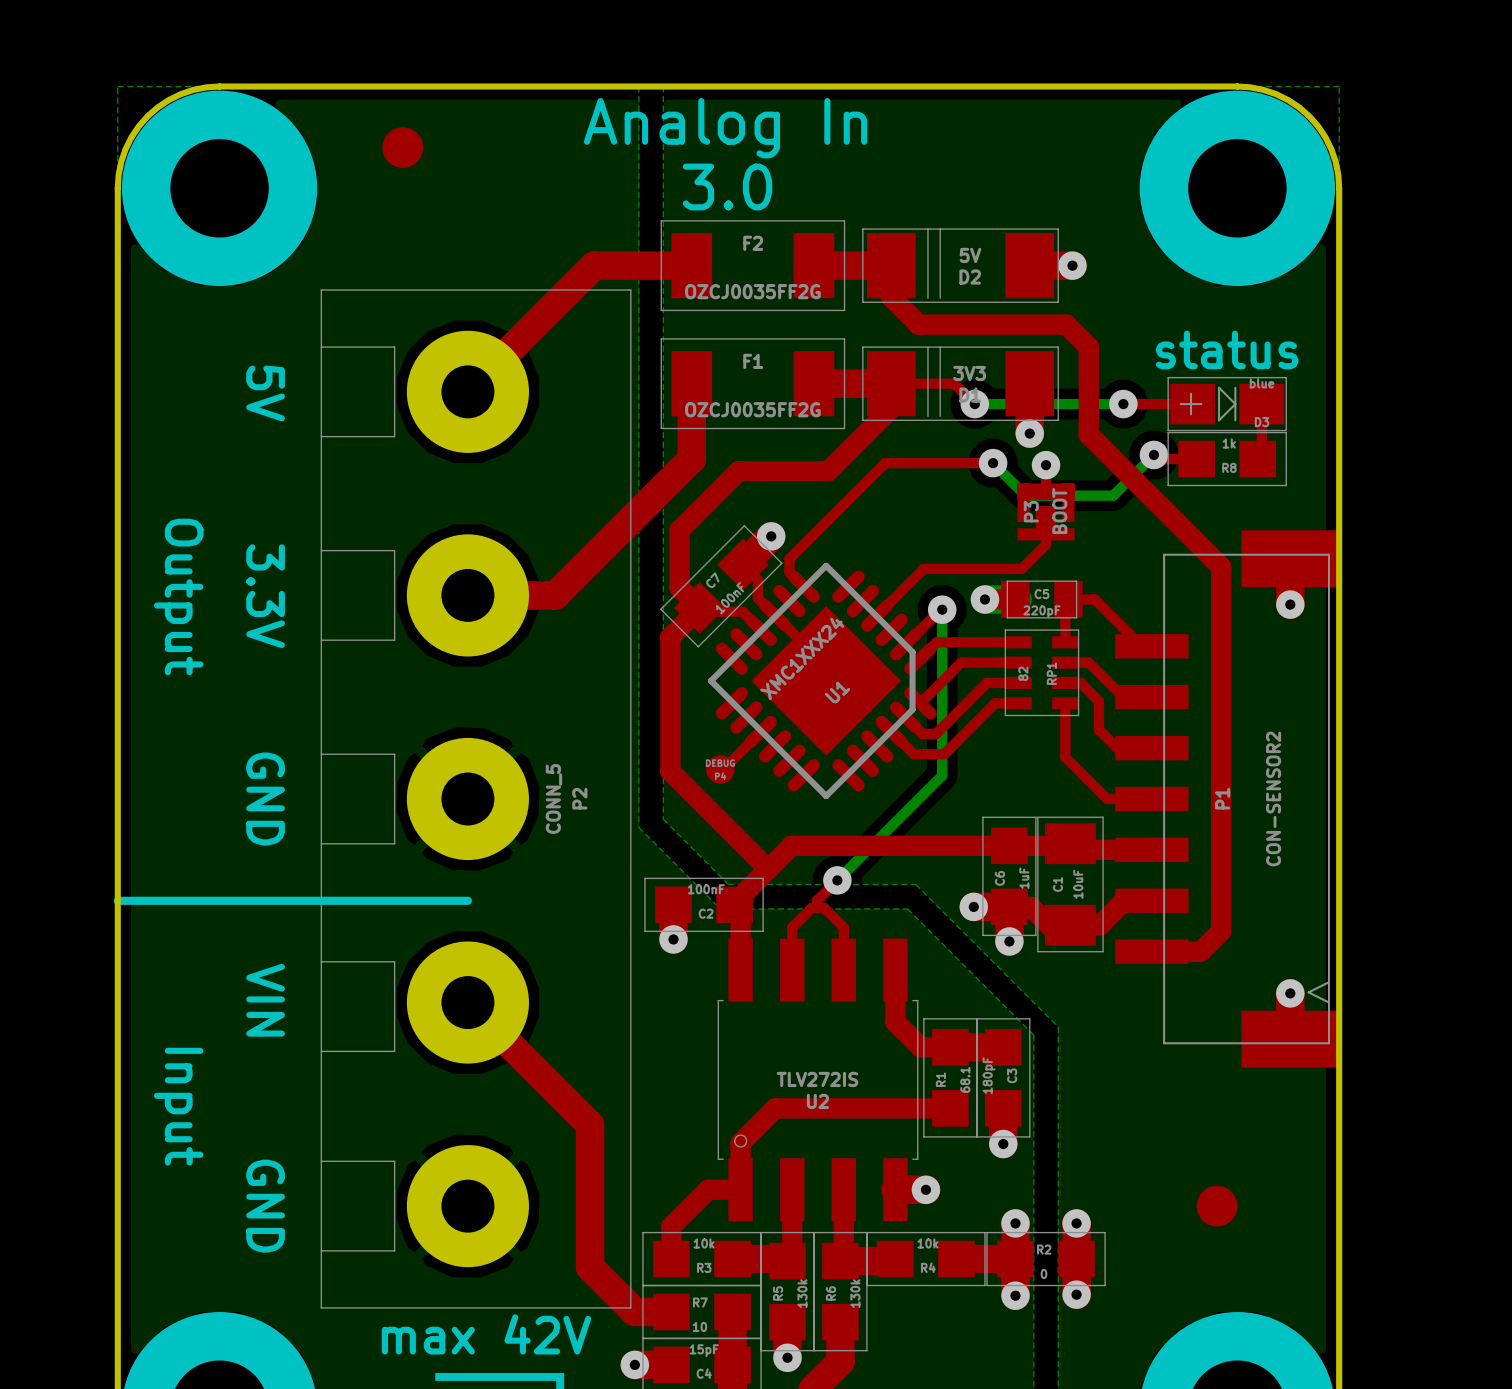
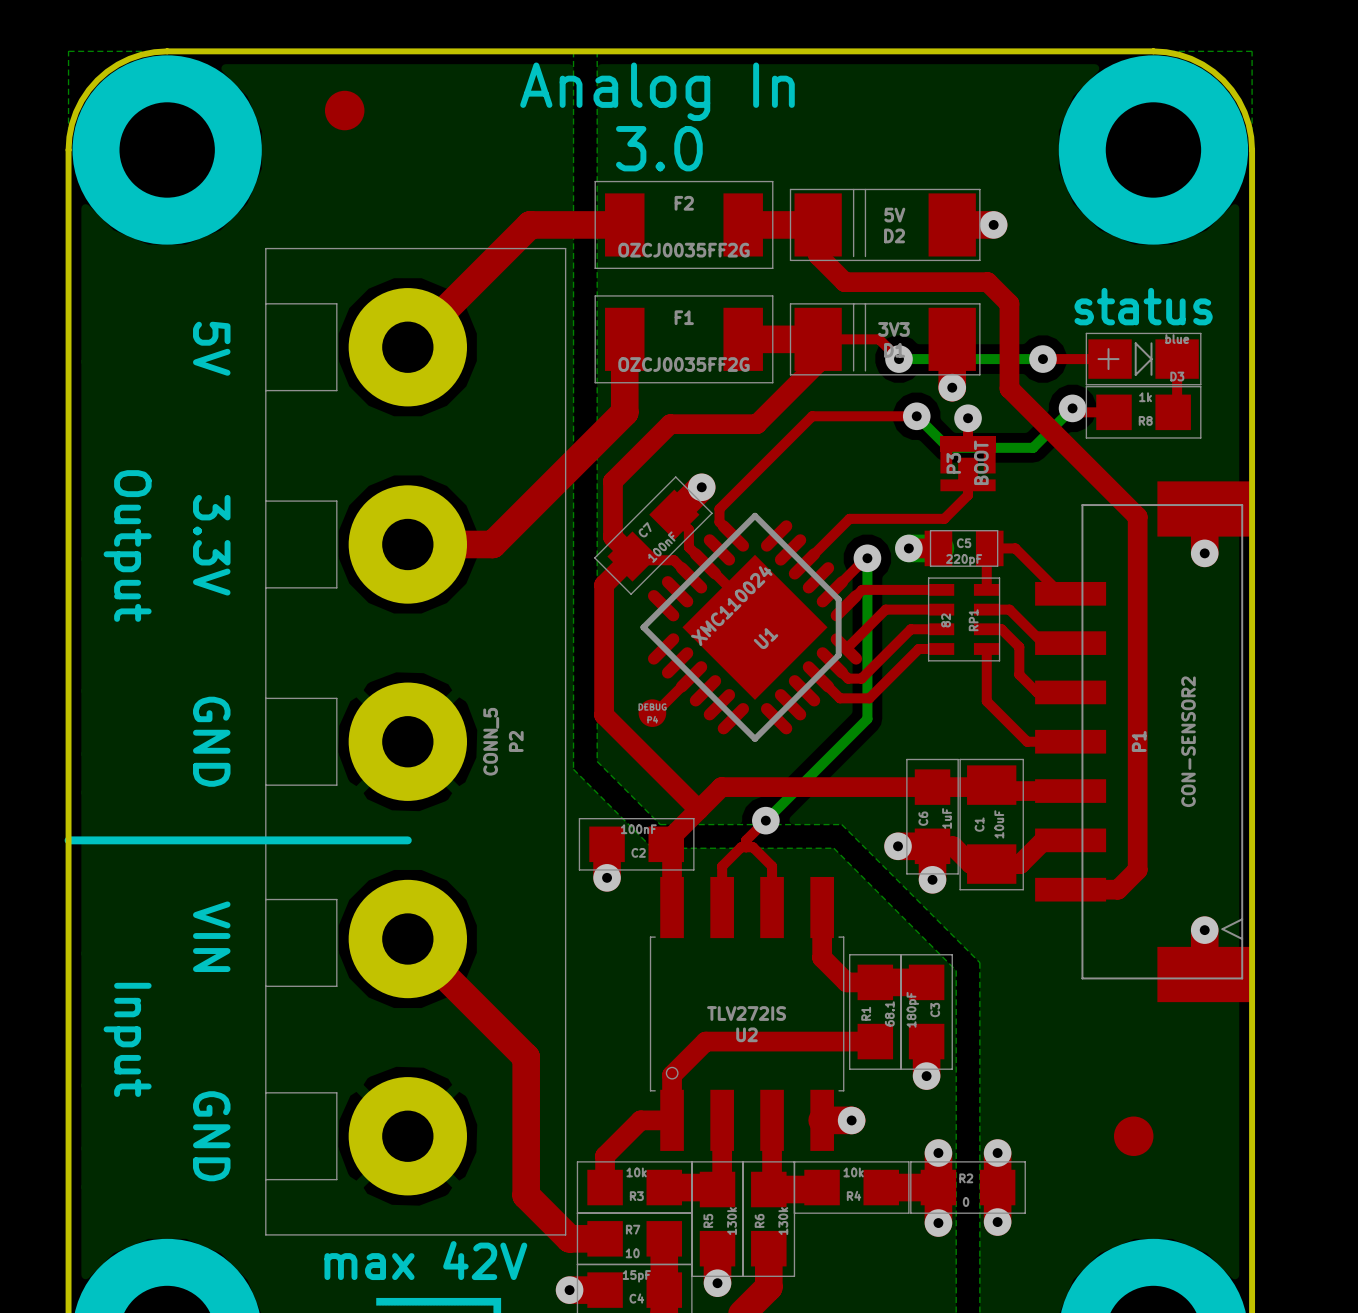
U1 value: XMC1XXX24 (802, 659) -> XMC110024 (731, 606)

